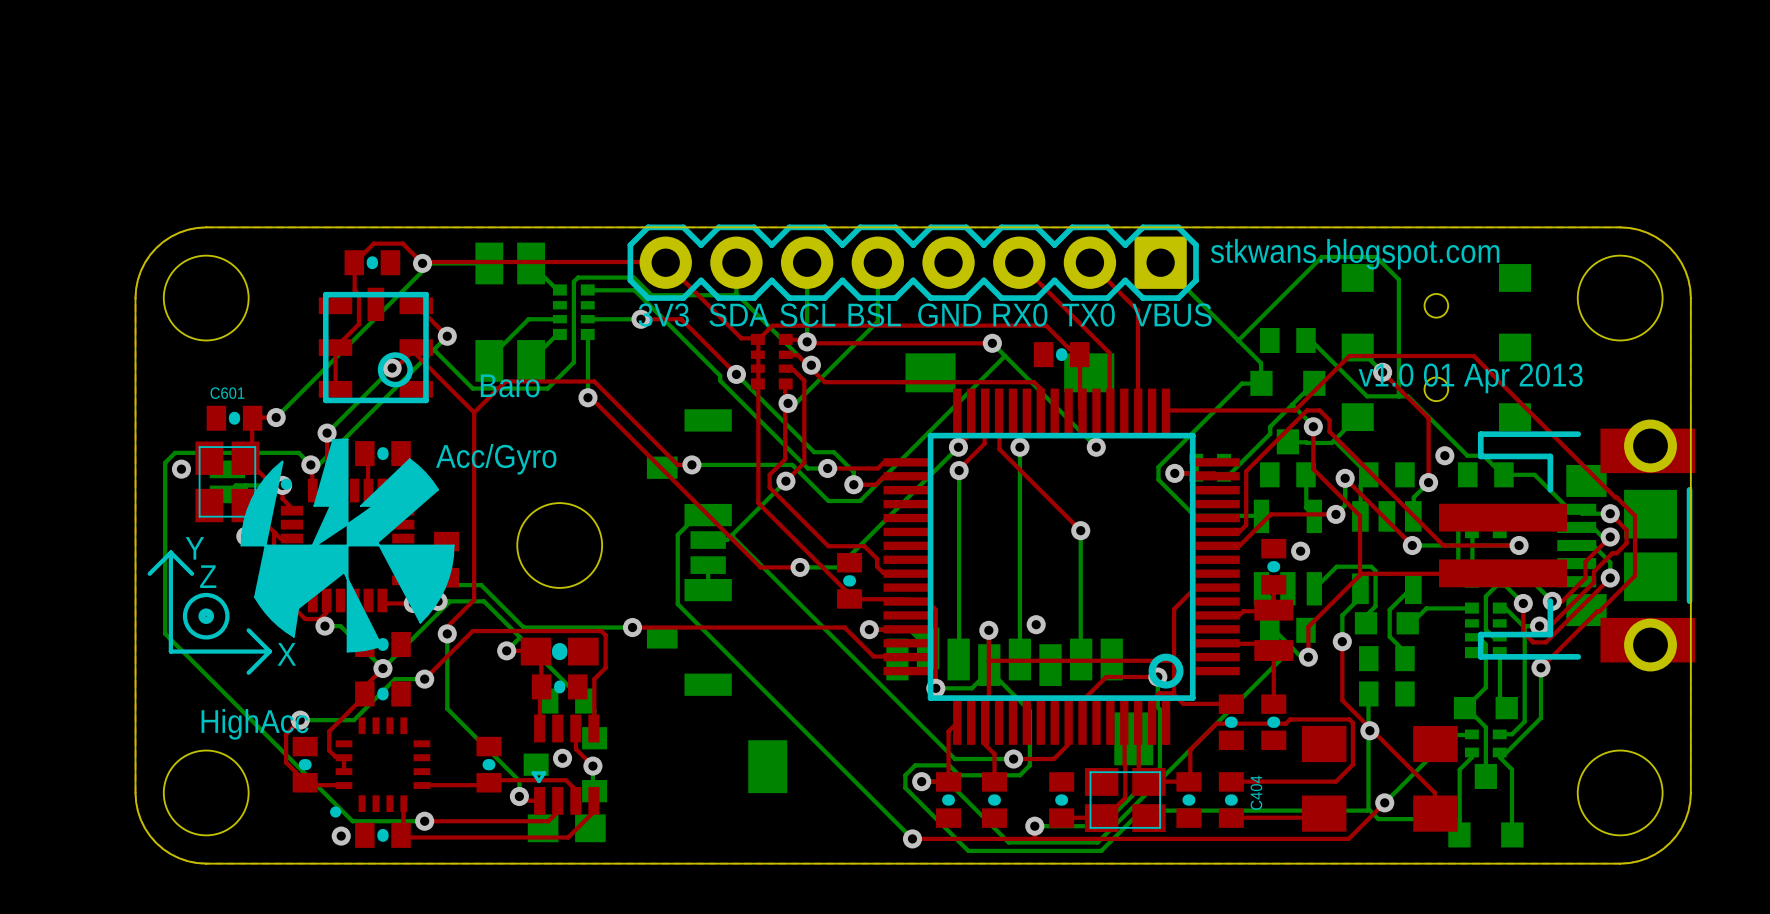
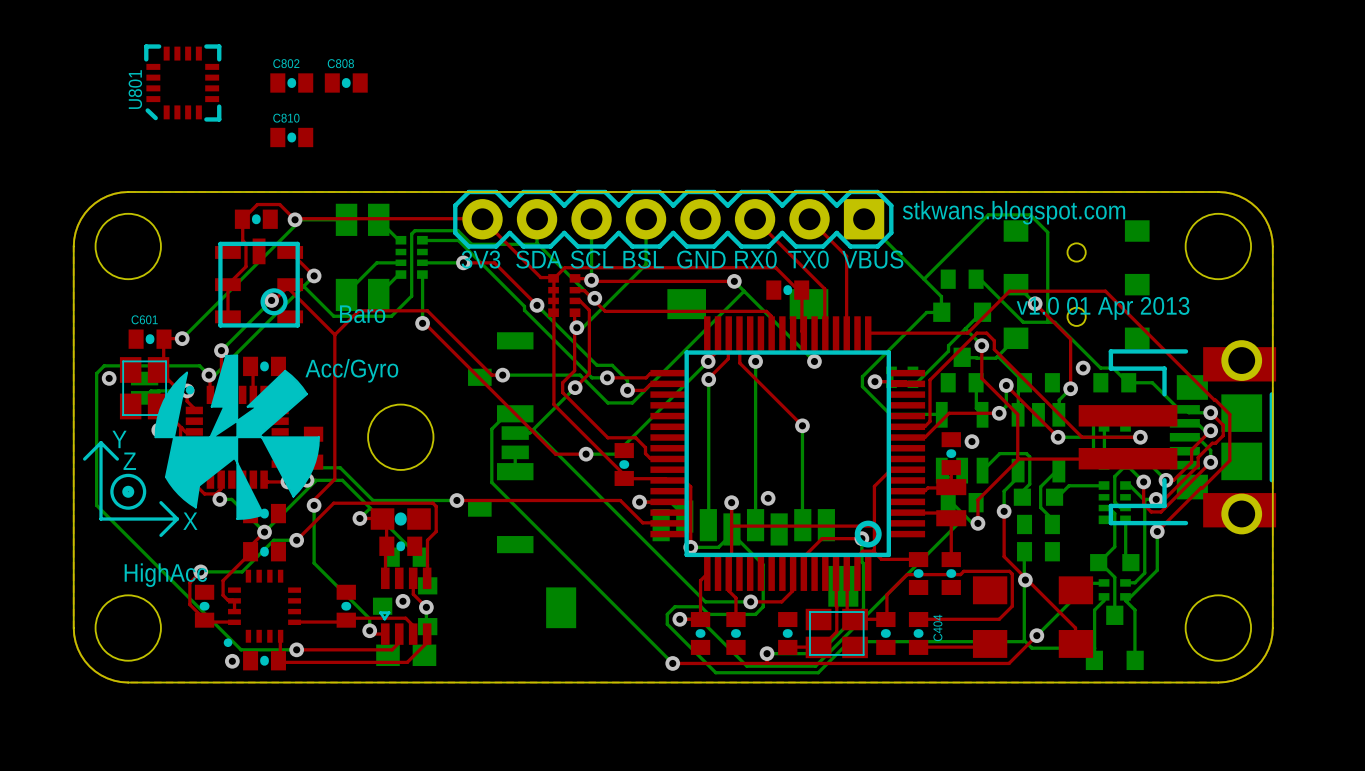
U801: none -> (182, 82)
C802: none -> (291, 82)
C808: none -> (346, 82)
C810: none -> (291, 137)

